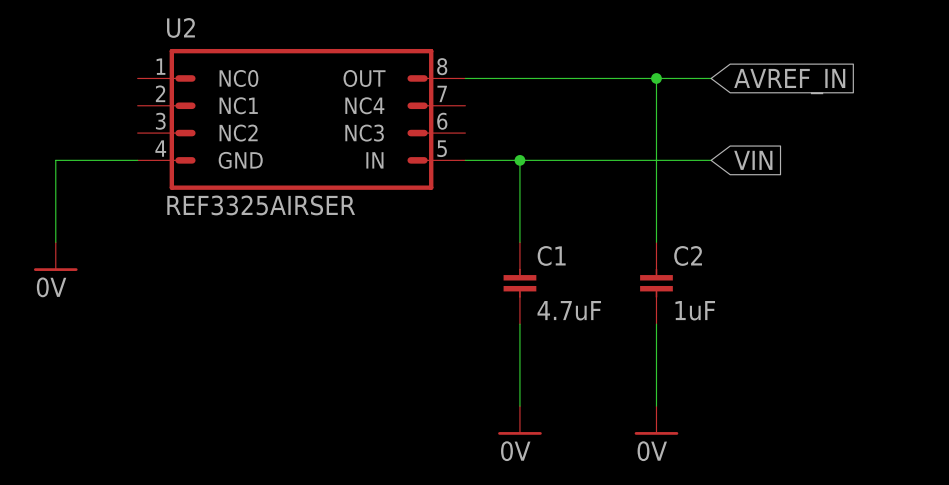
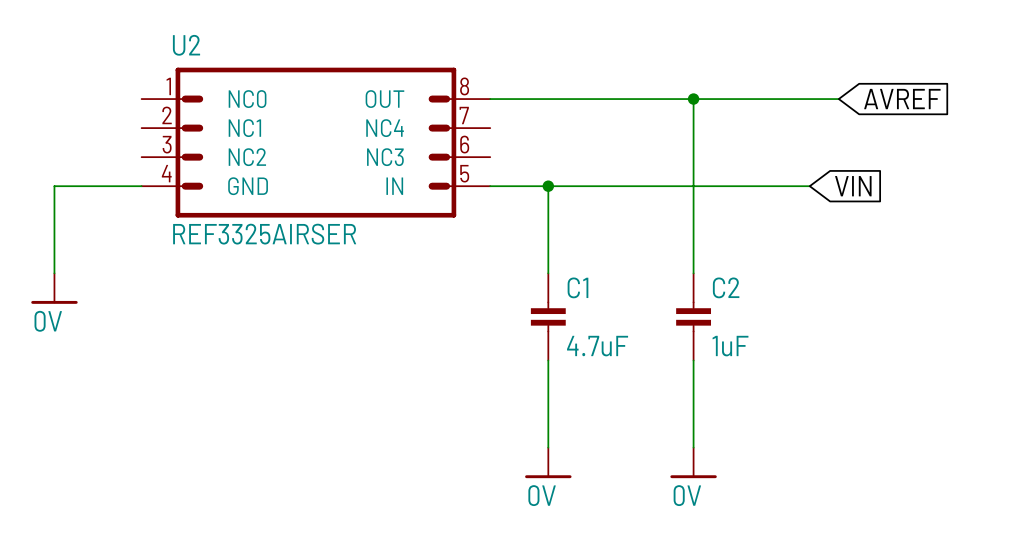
wire: none -> (751, 99) (838, 99)
global label: AVREF_IN (789, 81) -> AVREF (902, 99)
wire: none -> (751, 186) (809, 186)
global label position: VIN (753, 160) -> VIN (853, 186)

